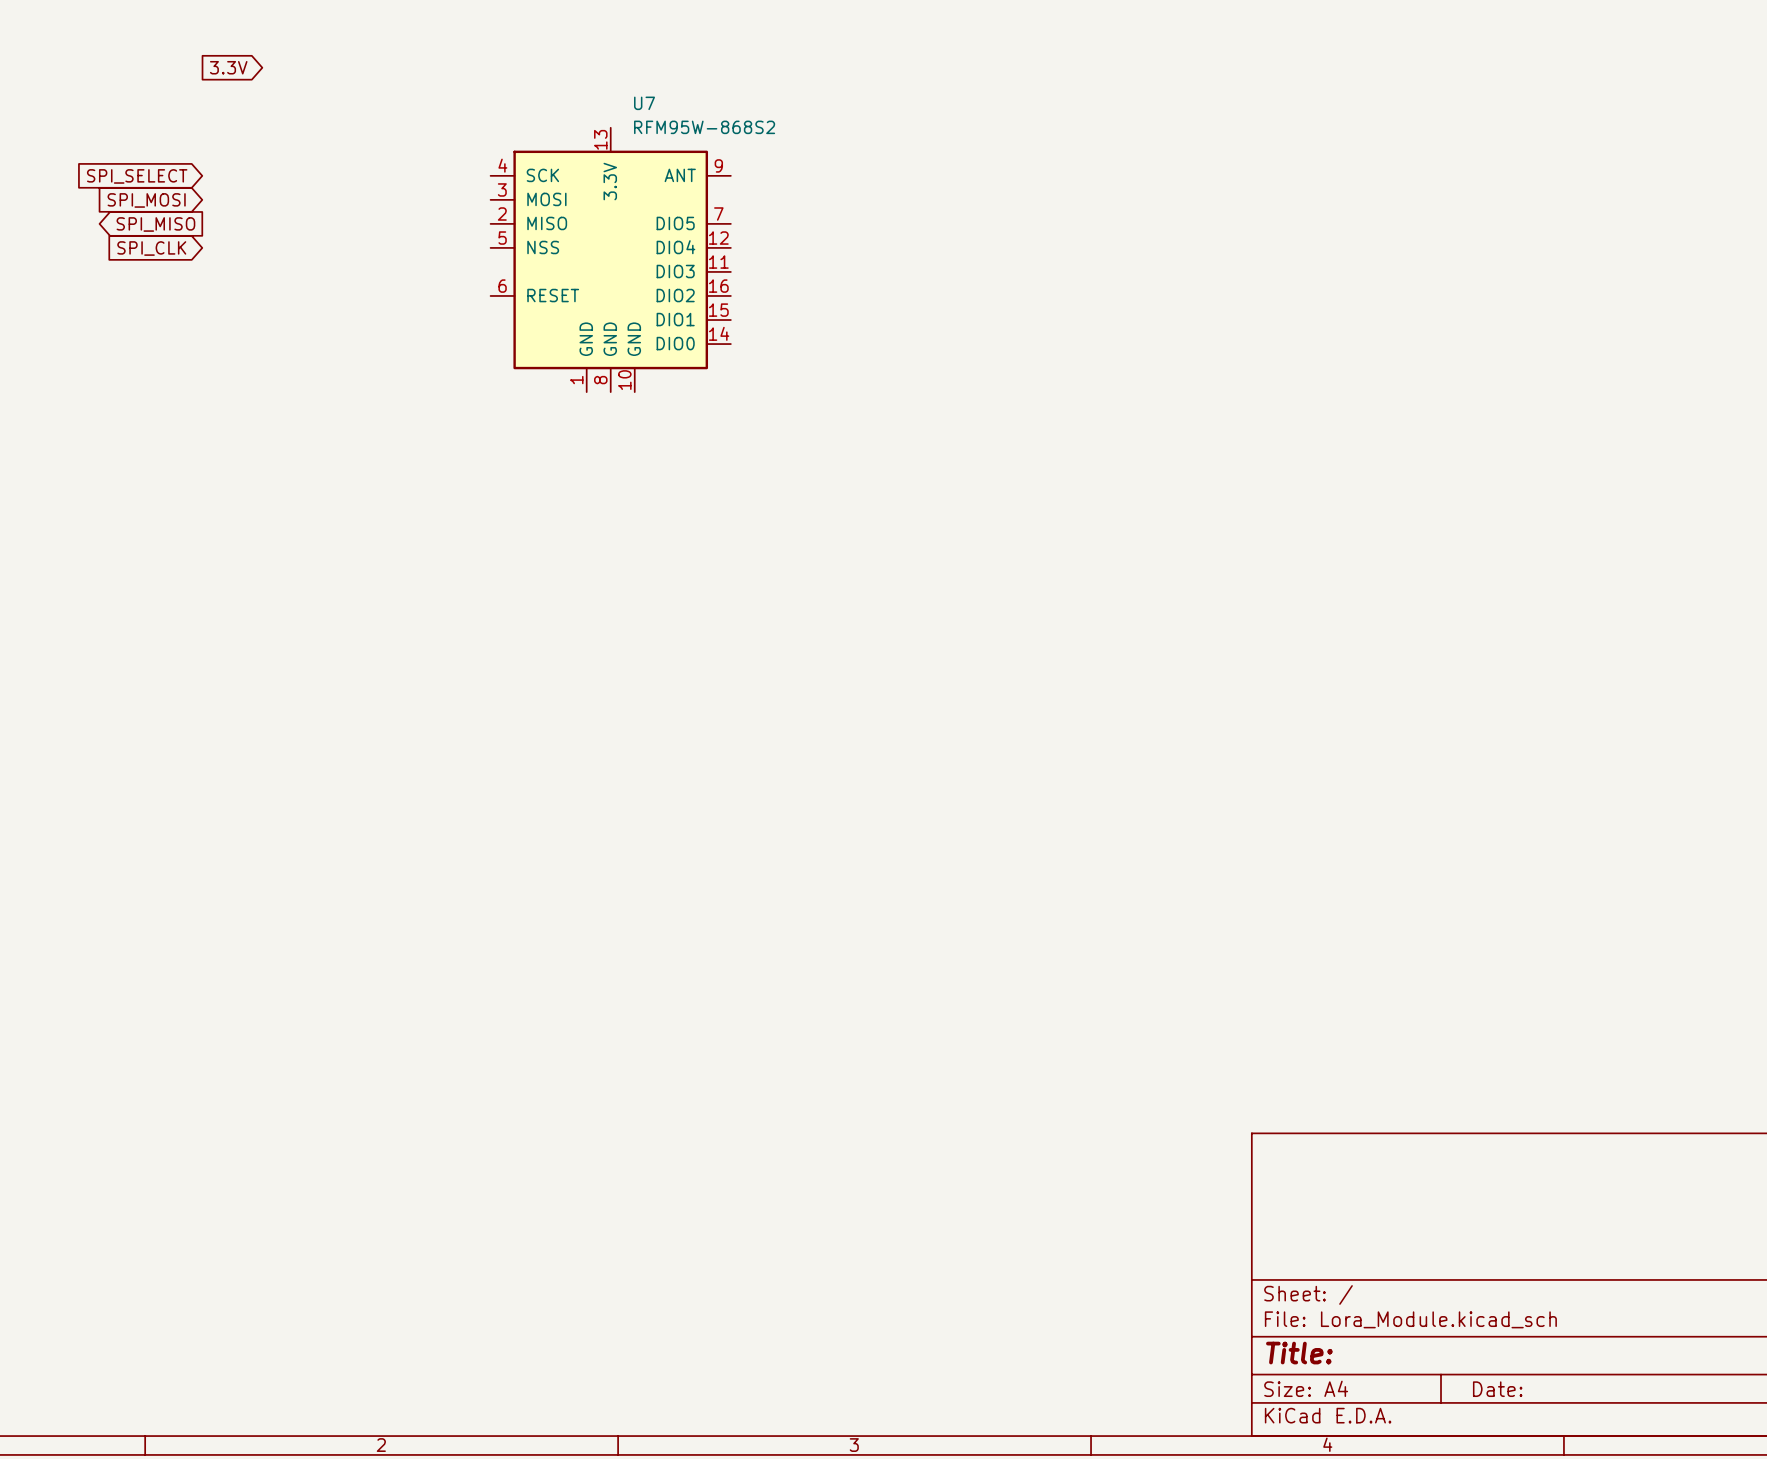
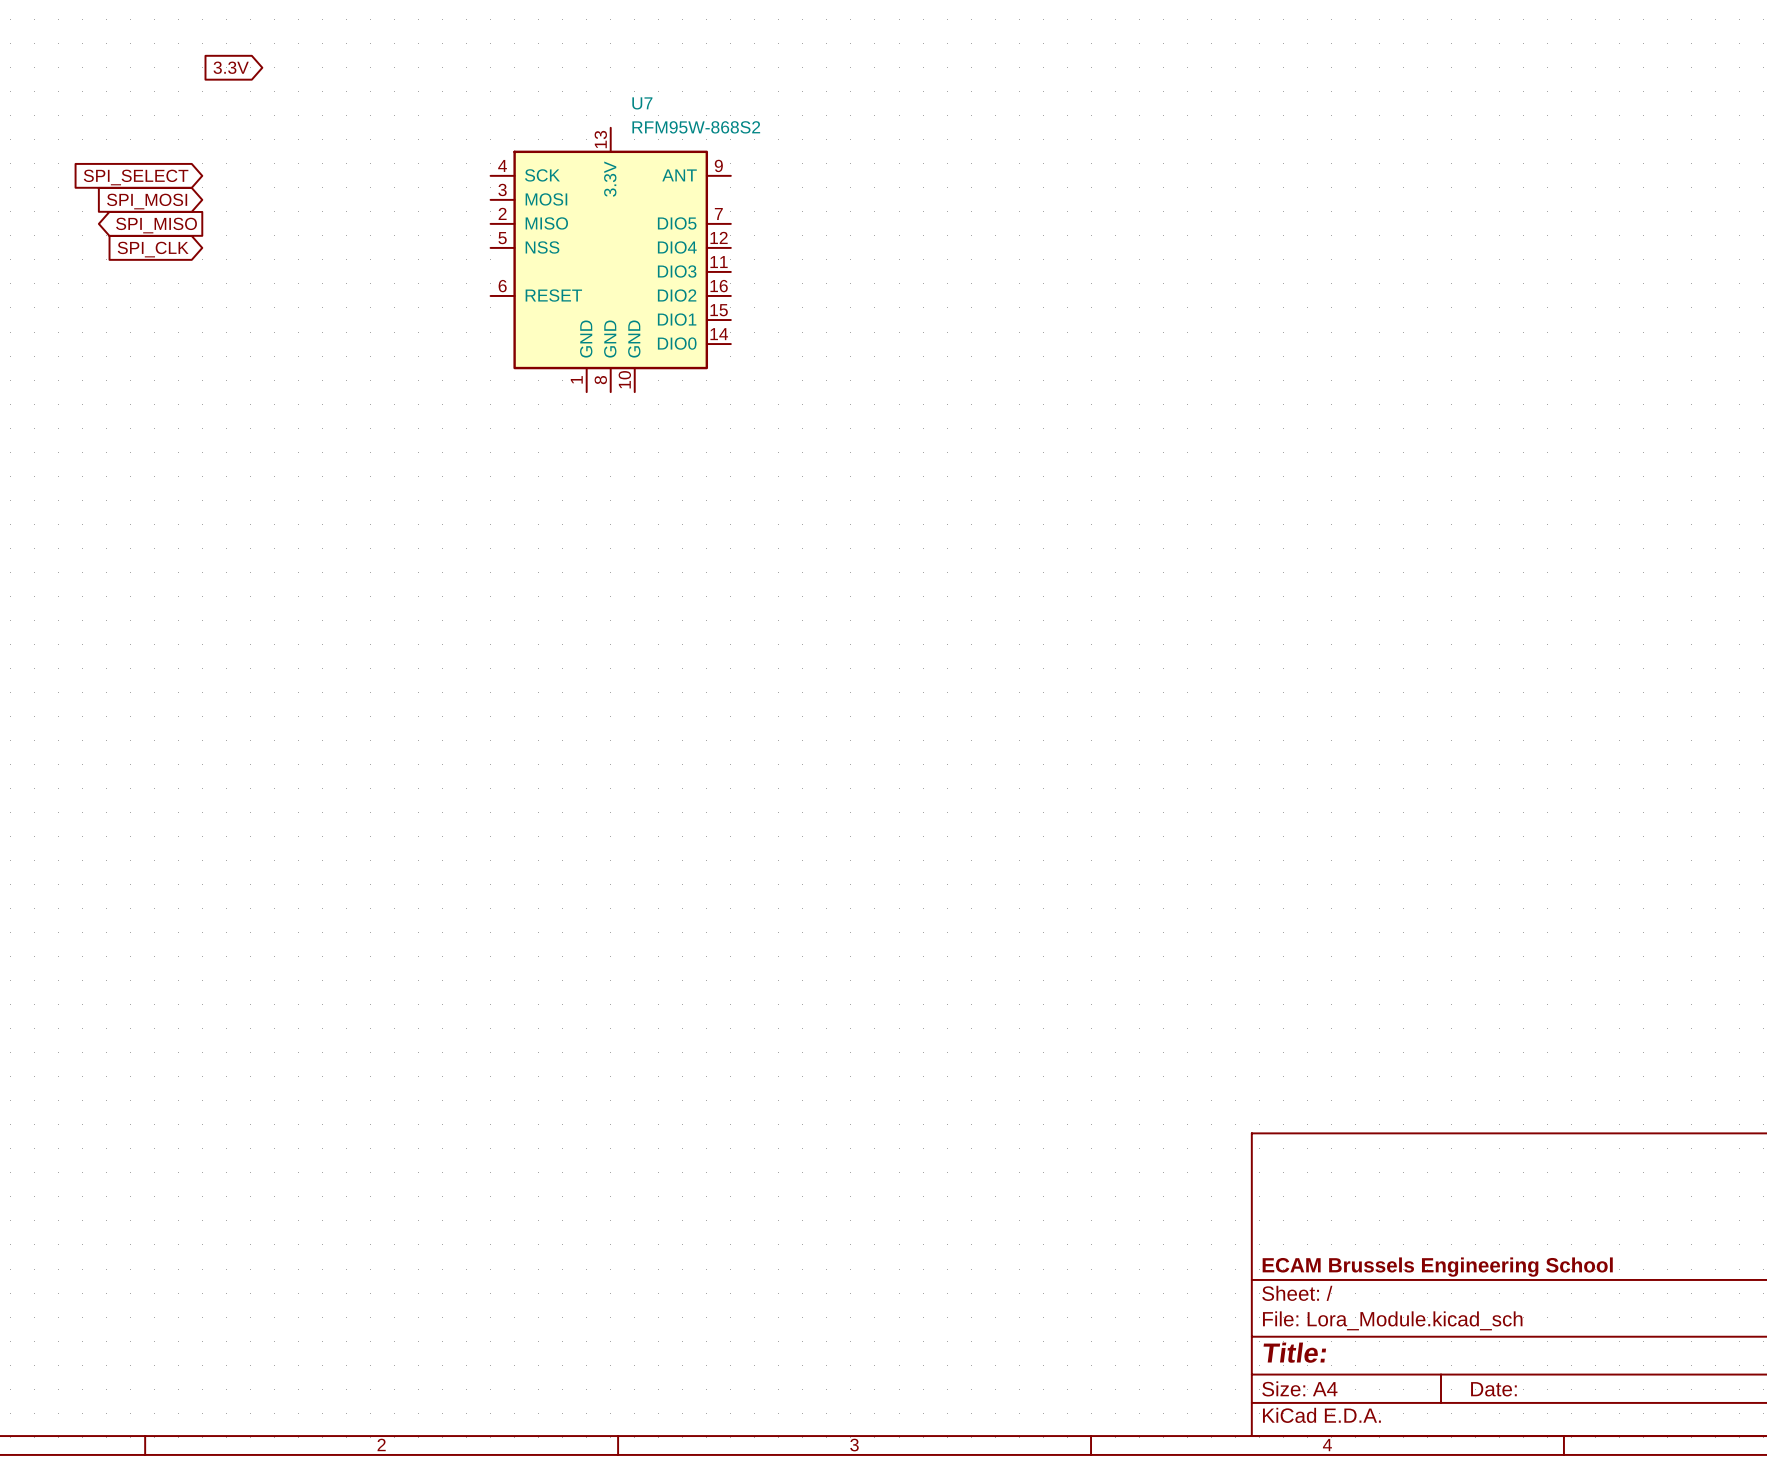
title block: none -> ECAM Brussels Engineering School (1437, 1267)

